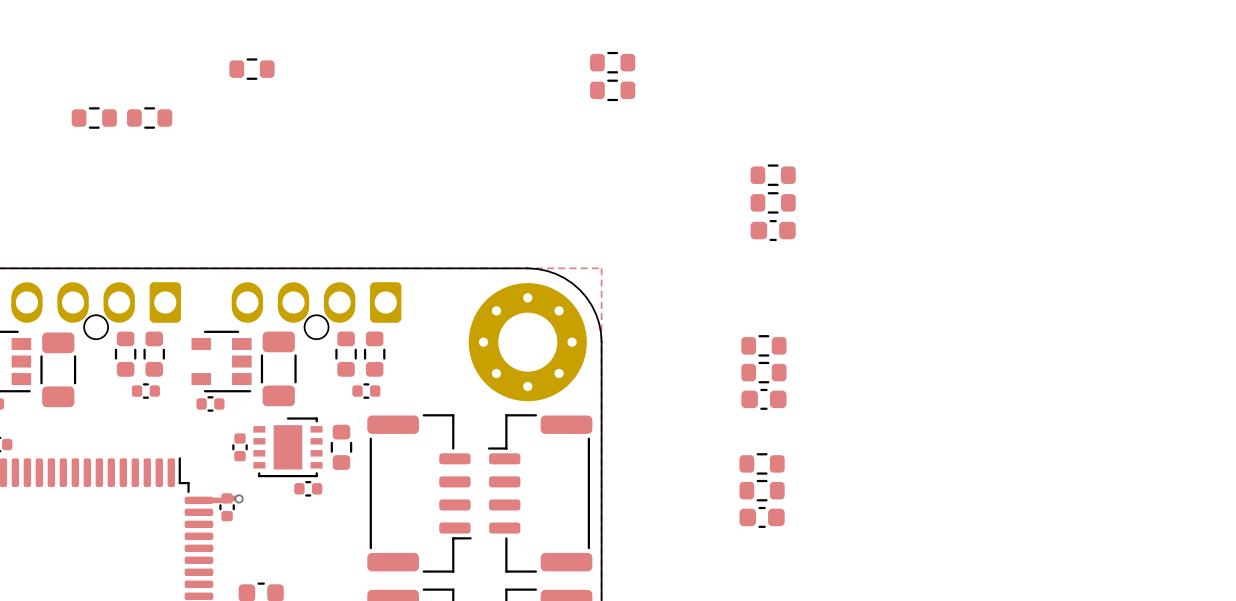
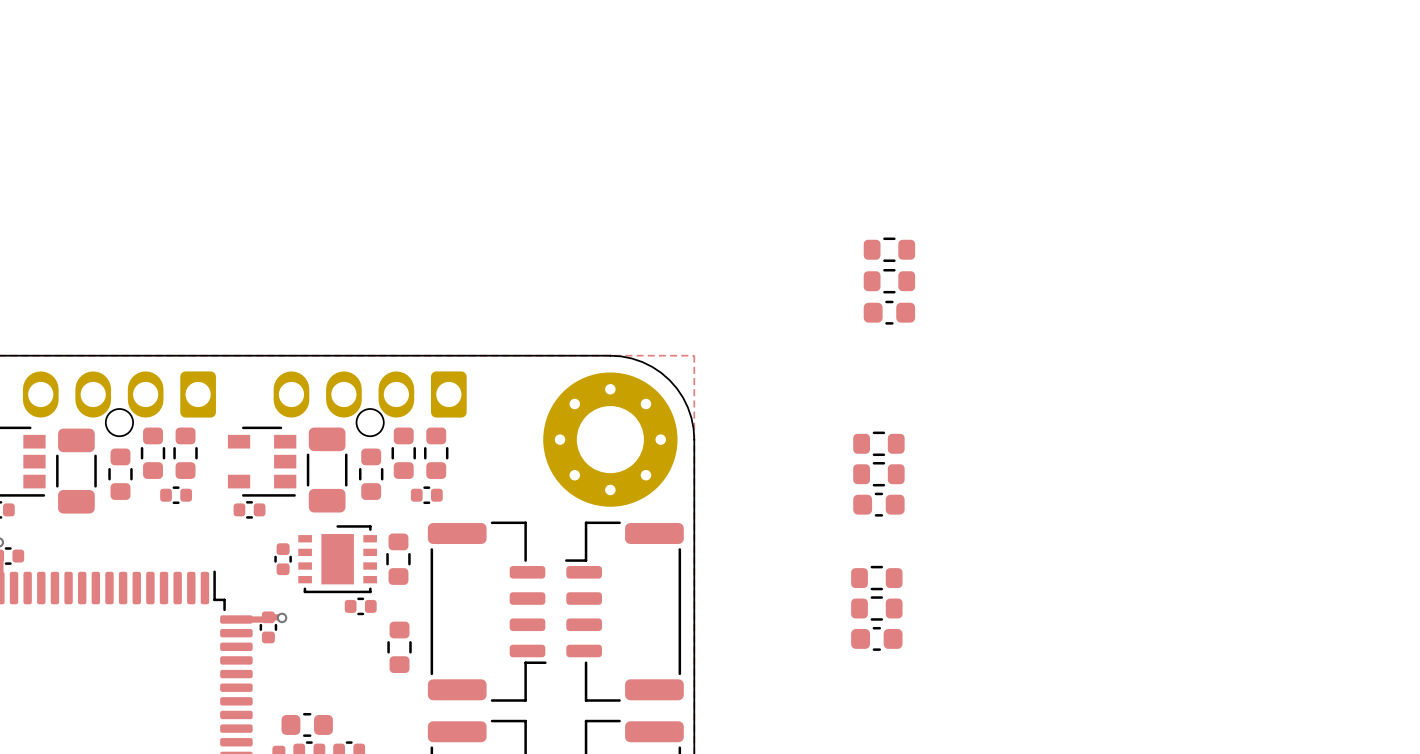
part: (612, 62) -> none
part: (251, 69) -> none
part: (612, 90) -> none
part: (94, 118) -> none
part: (149, 118) -> none
part: none -> (120, 474)
part: none -> (371, 474)
part: none -> (399, 647)

